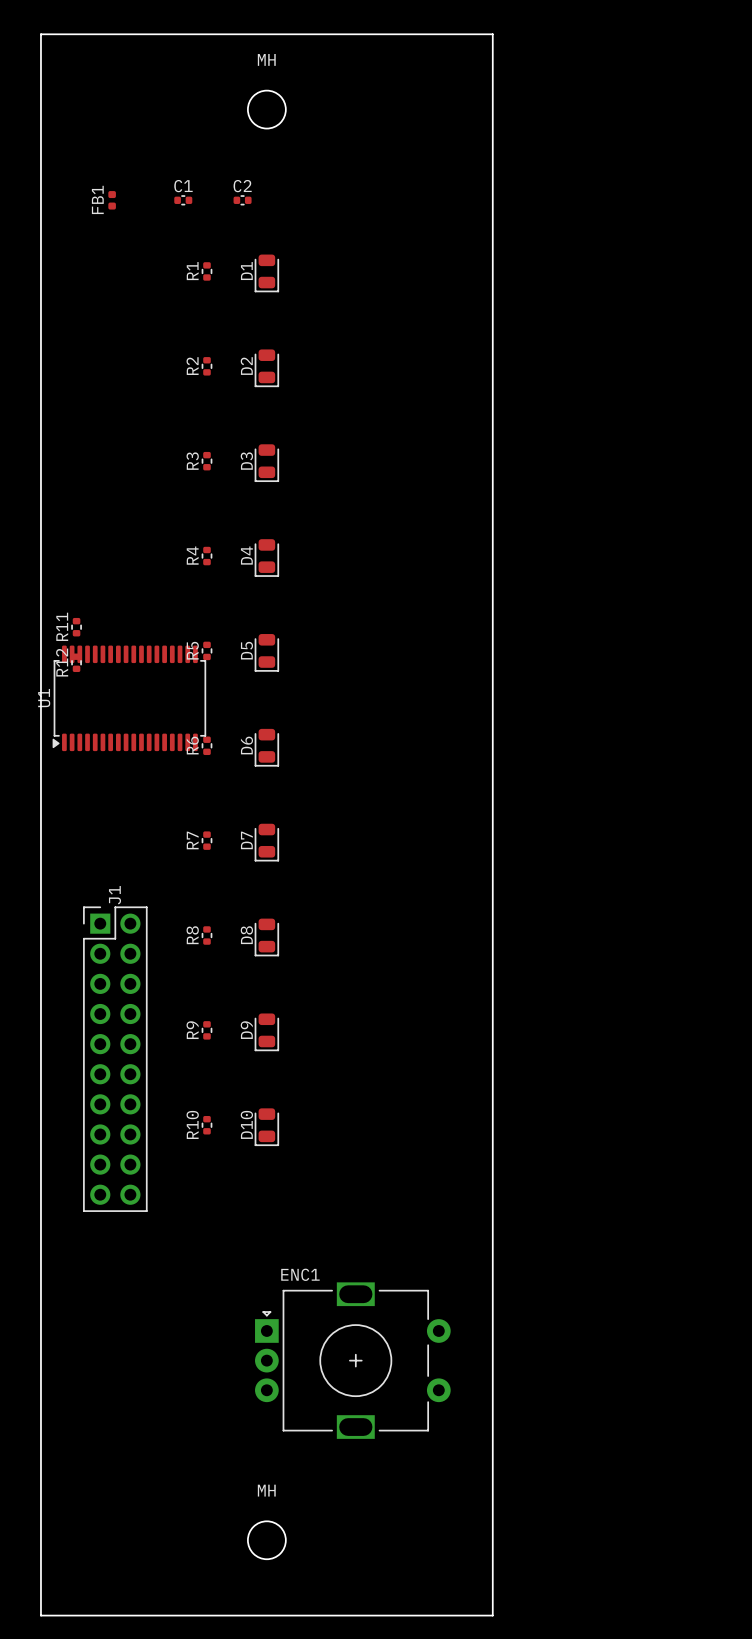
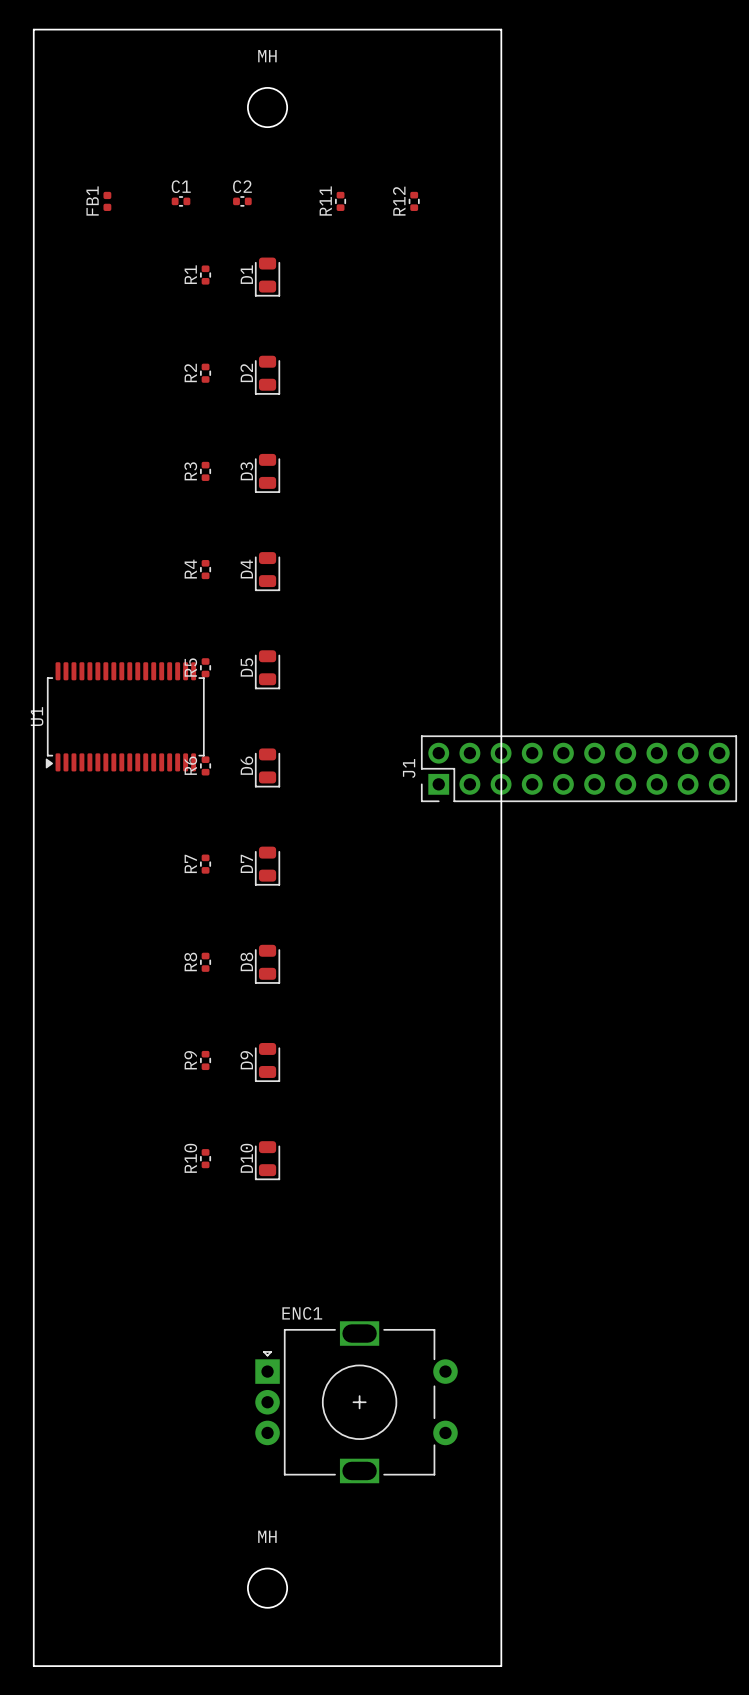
R11 position: (76, 627) -> (340, 201)
R12 position: (76, 662) -> (414, 201)
J1 rotation: 0° (115, 1059) -> 90° counterclockwise (579, 768)
J1 position: (115, 1059) -> (579, 768)

